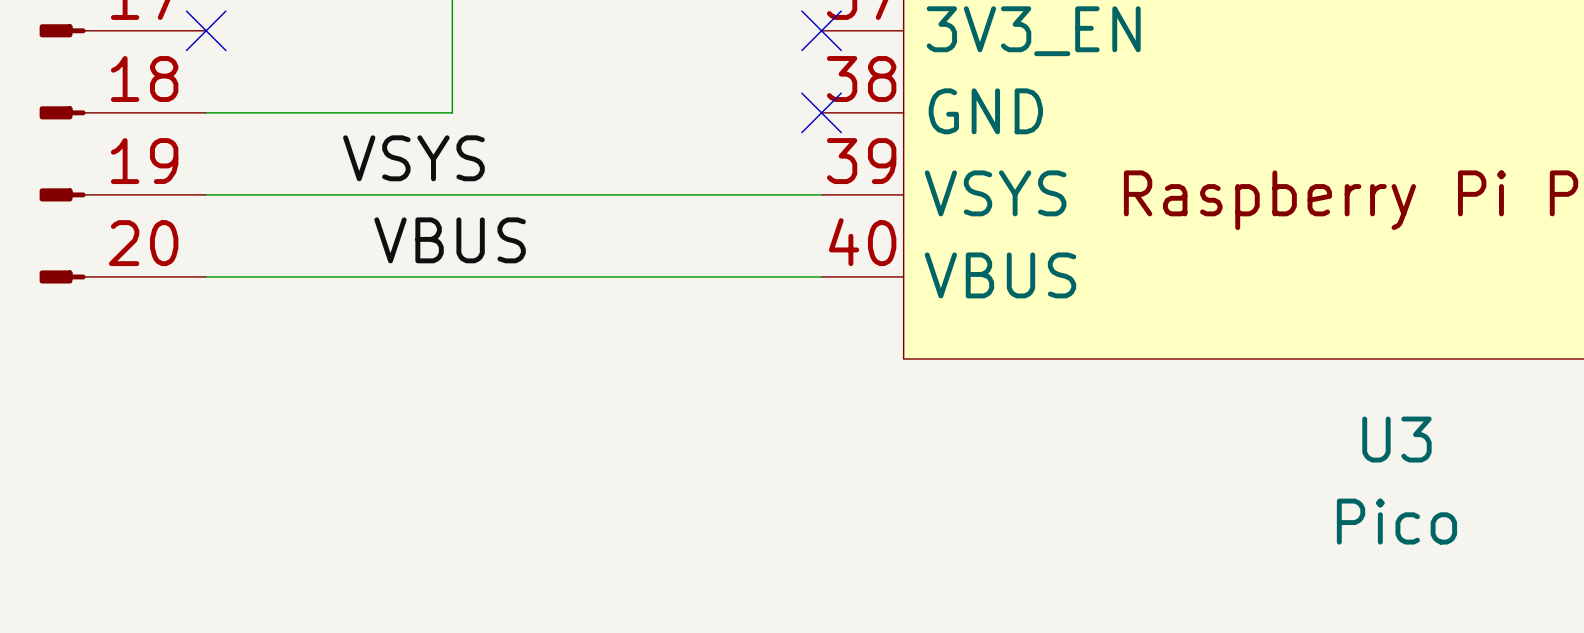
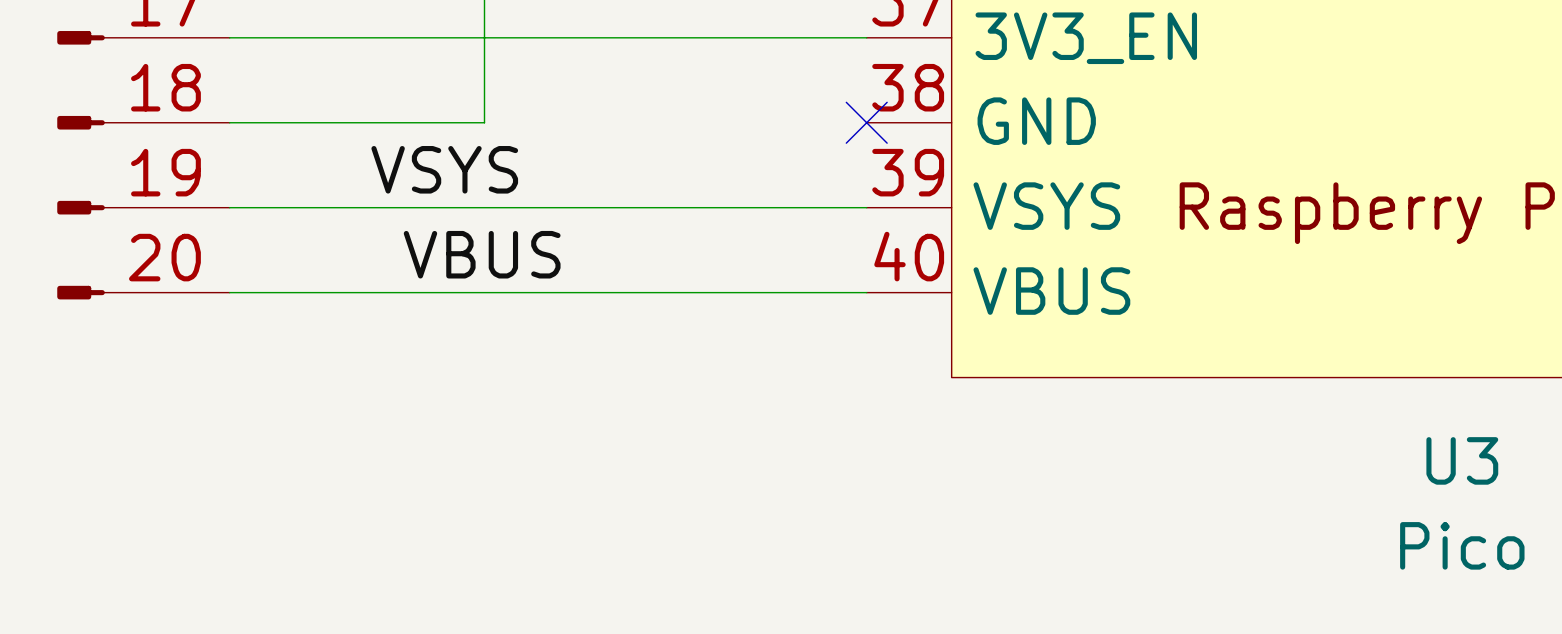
wire: none -> (229, 37) (866, 37)
no-connect mark: (206, 30) -> none
no-connect mark: (821, 30) -> none

